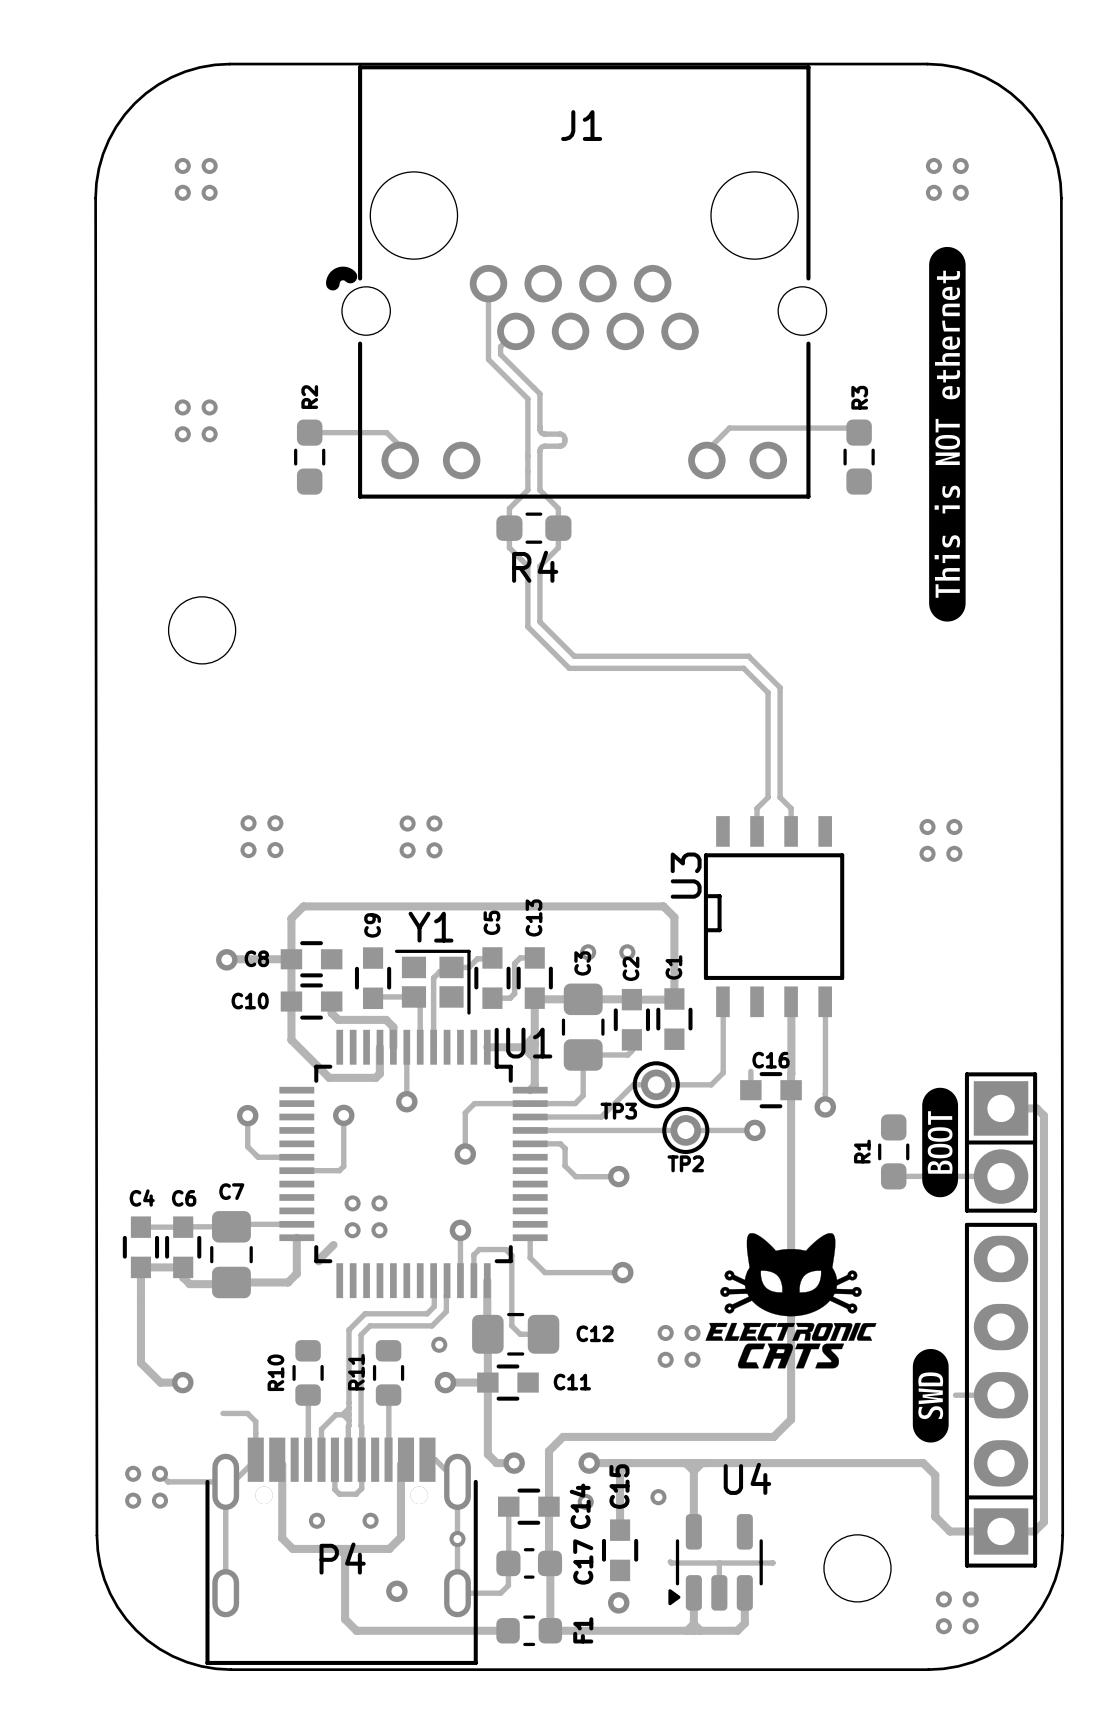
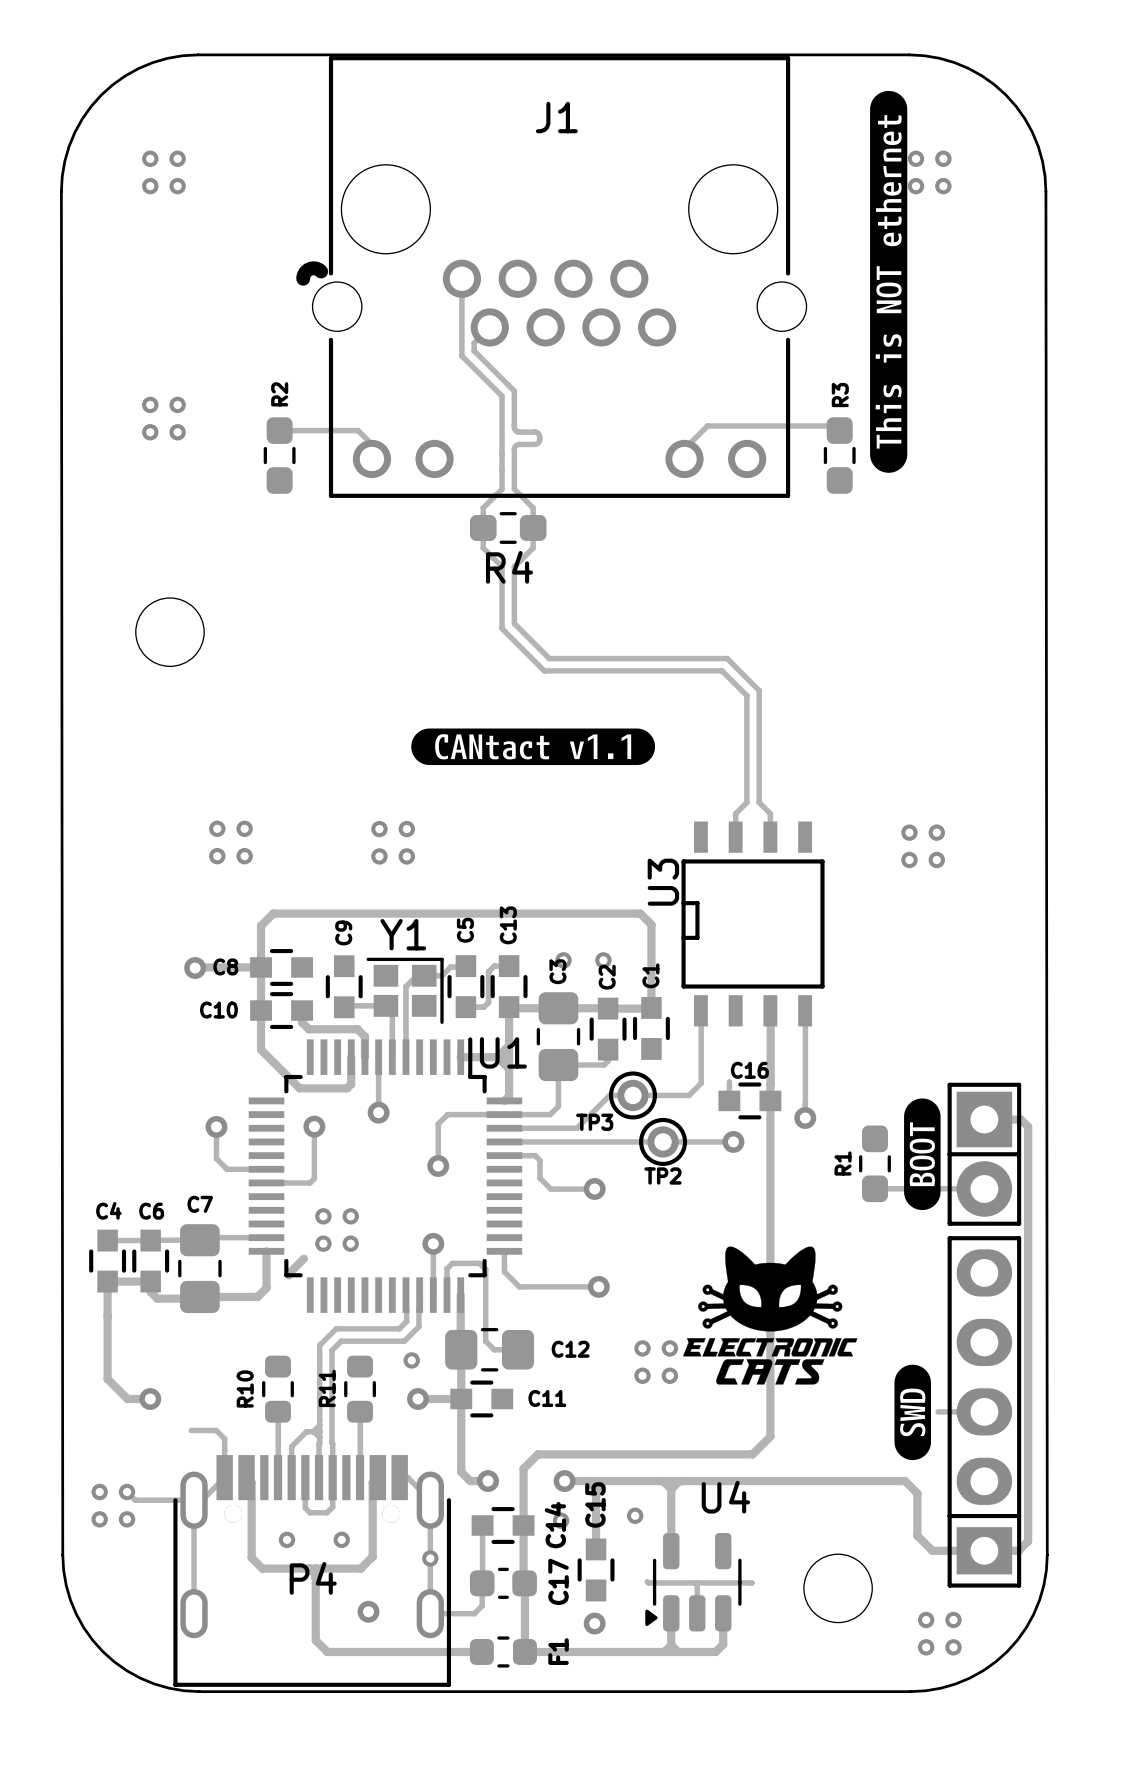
drawing position: (947, 434) -> (888, 281)
drawing: none -> [411, 728, 656, 766]

